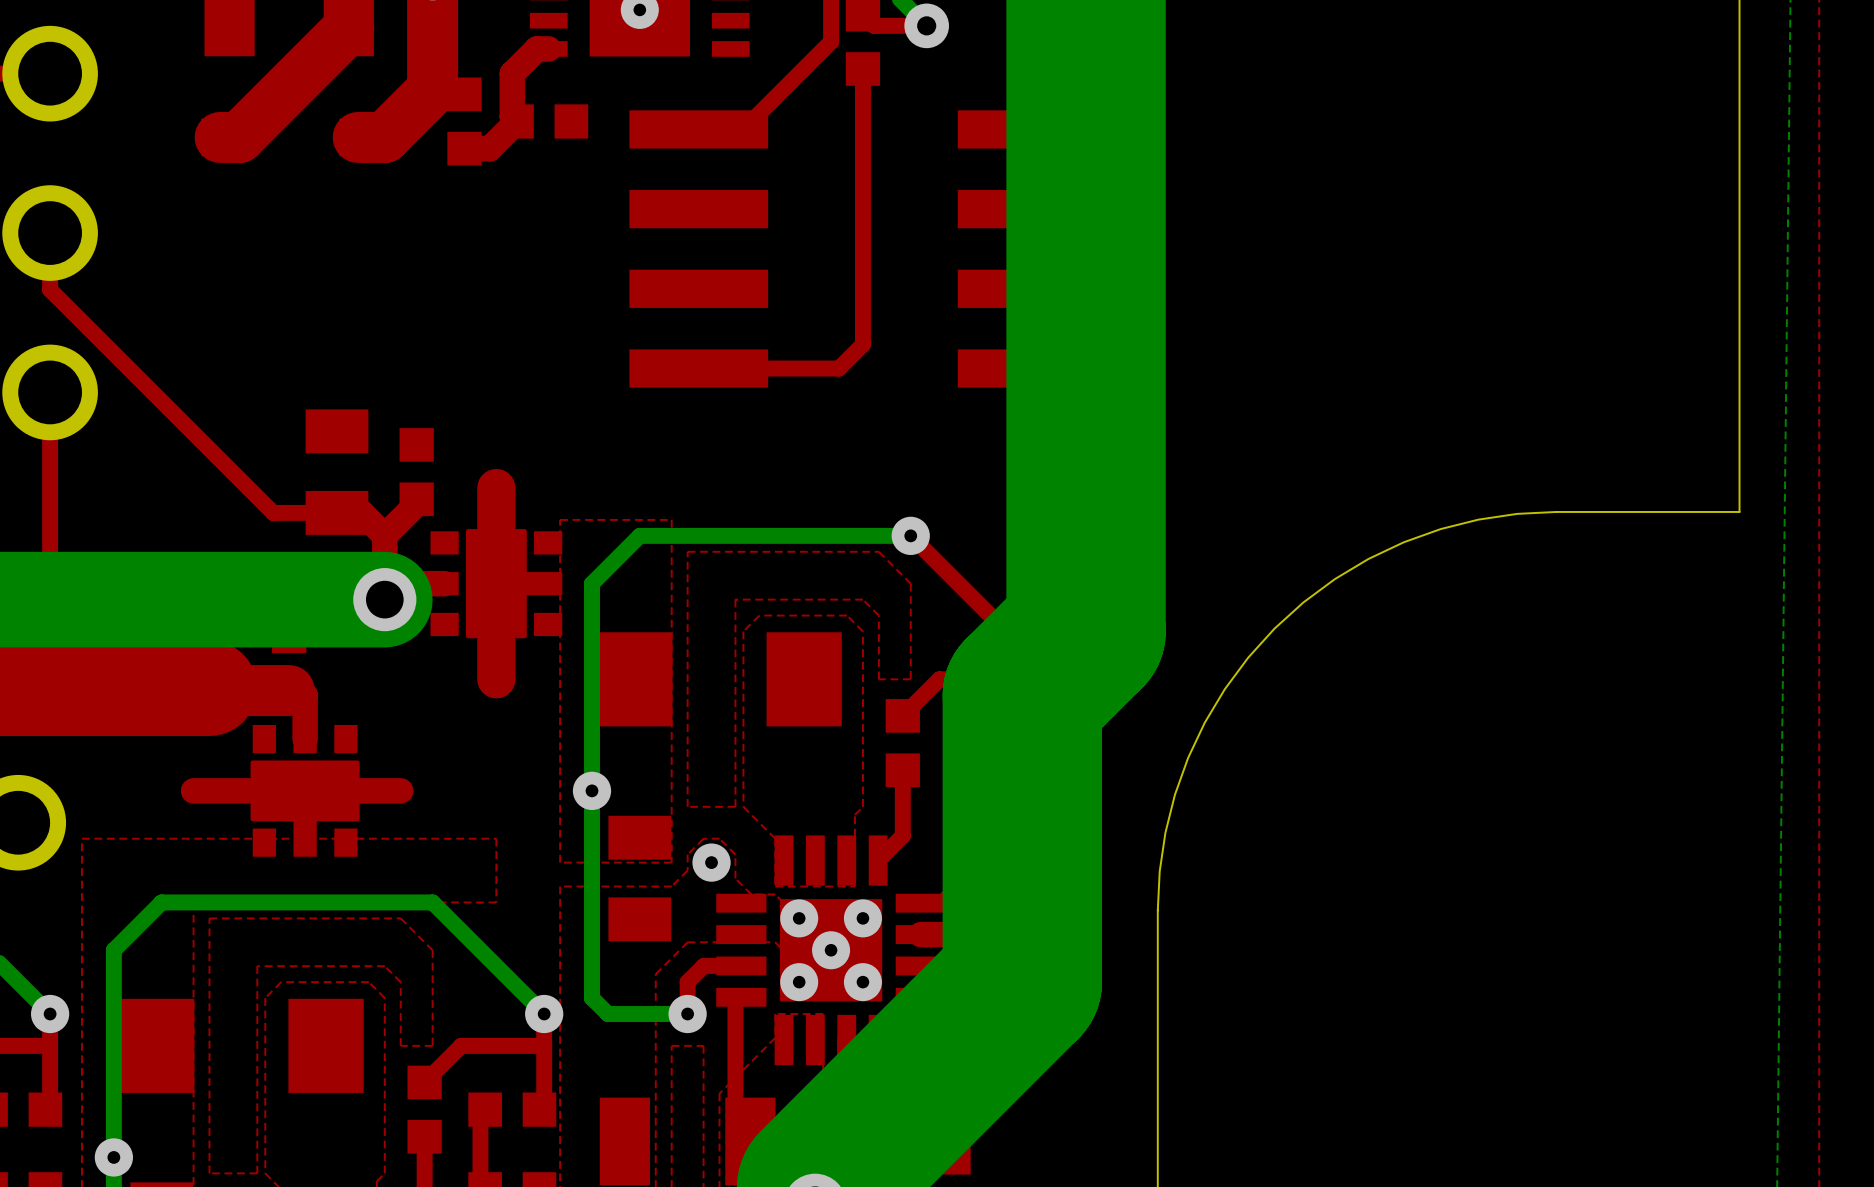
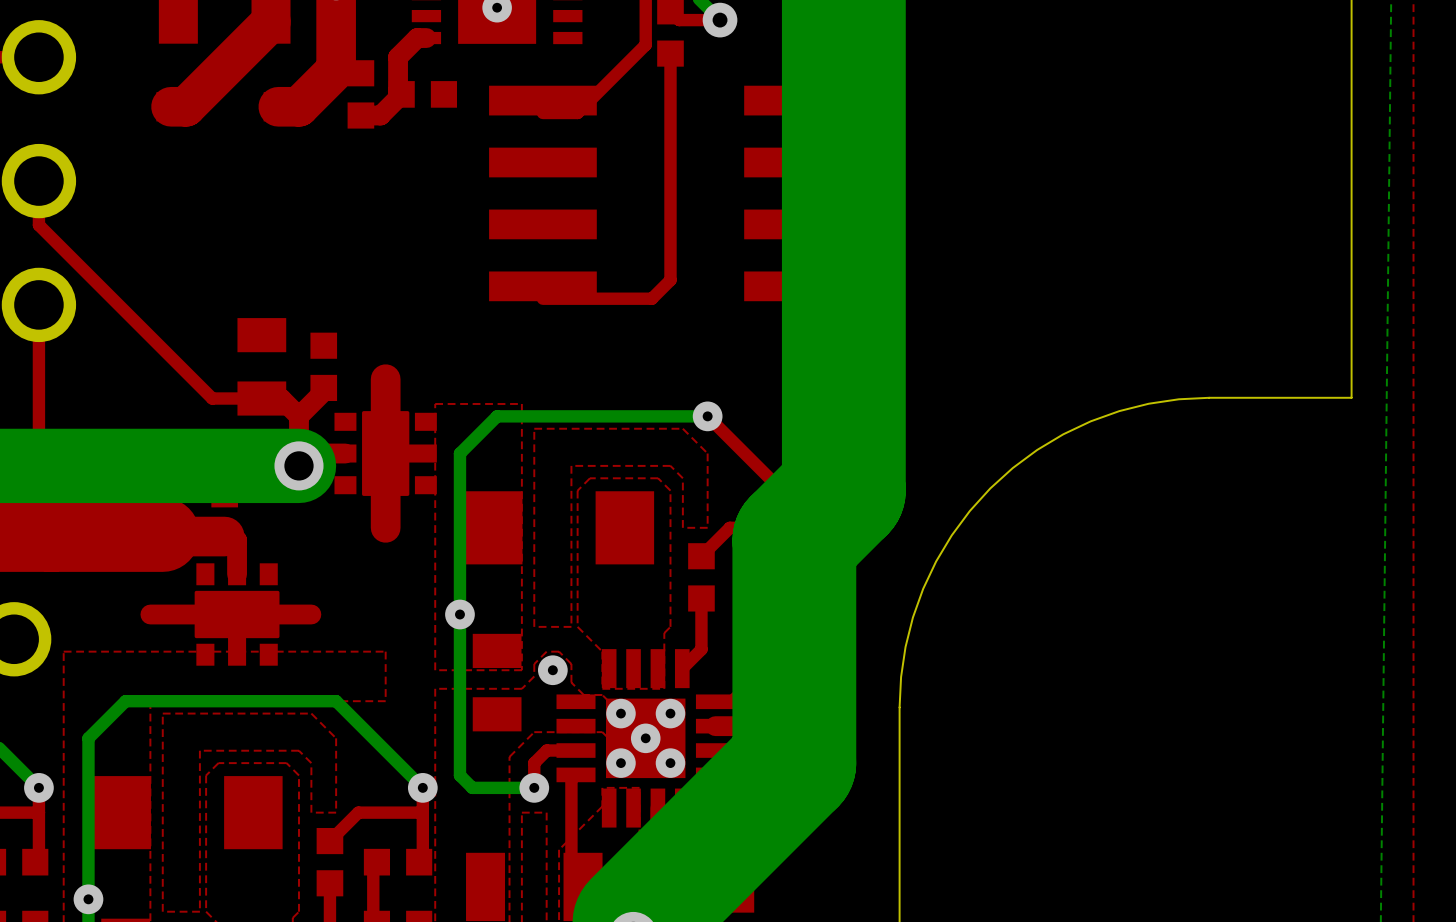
top track: (831, 41) (743, 129) (698, 129) -> (645, 32) (645, 44) (577, 112) (542, 112)
top track: (862, 344) (839, 368) (698, 368) -> (670, 267) (670, 280) (651, 298) (542, 298)

